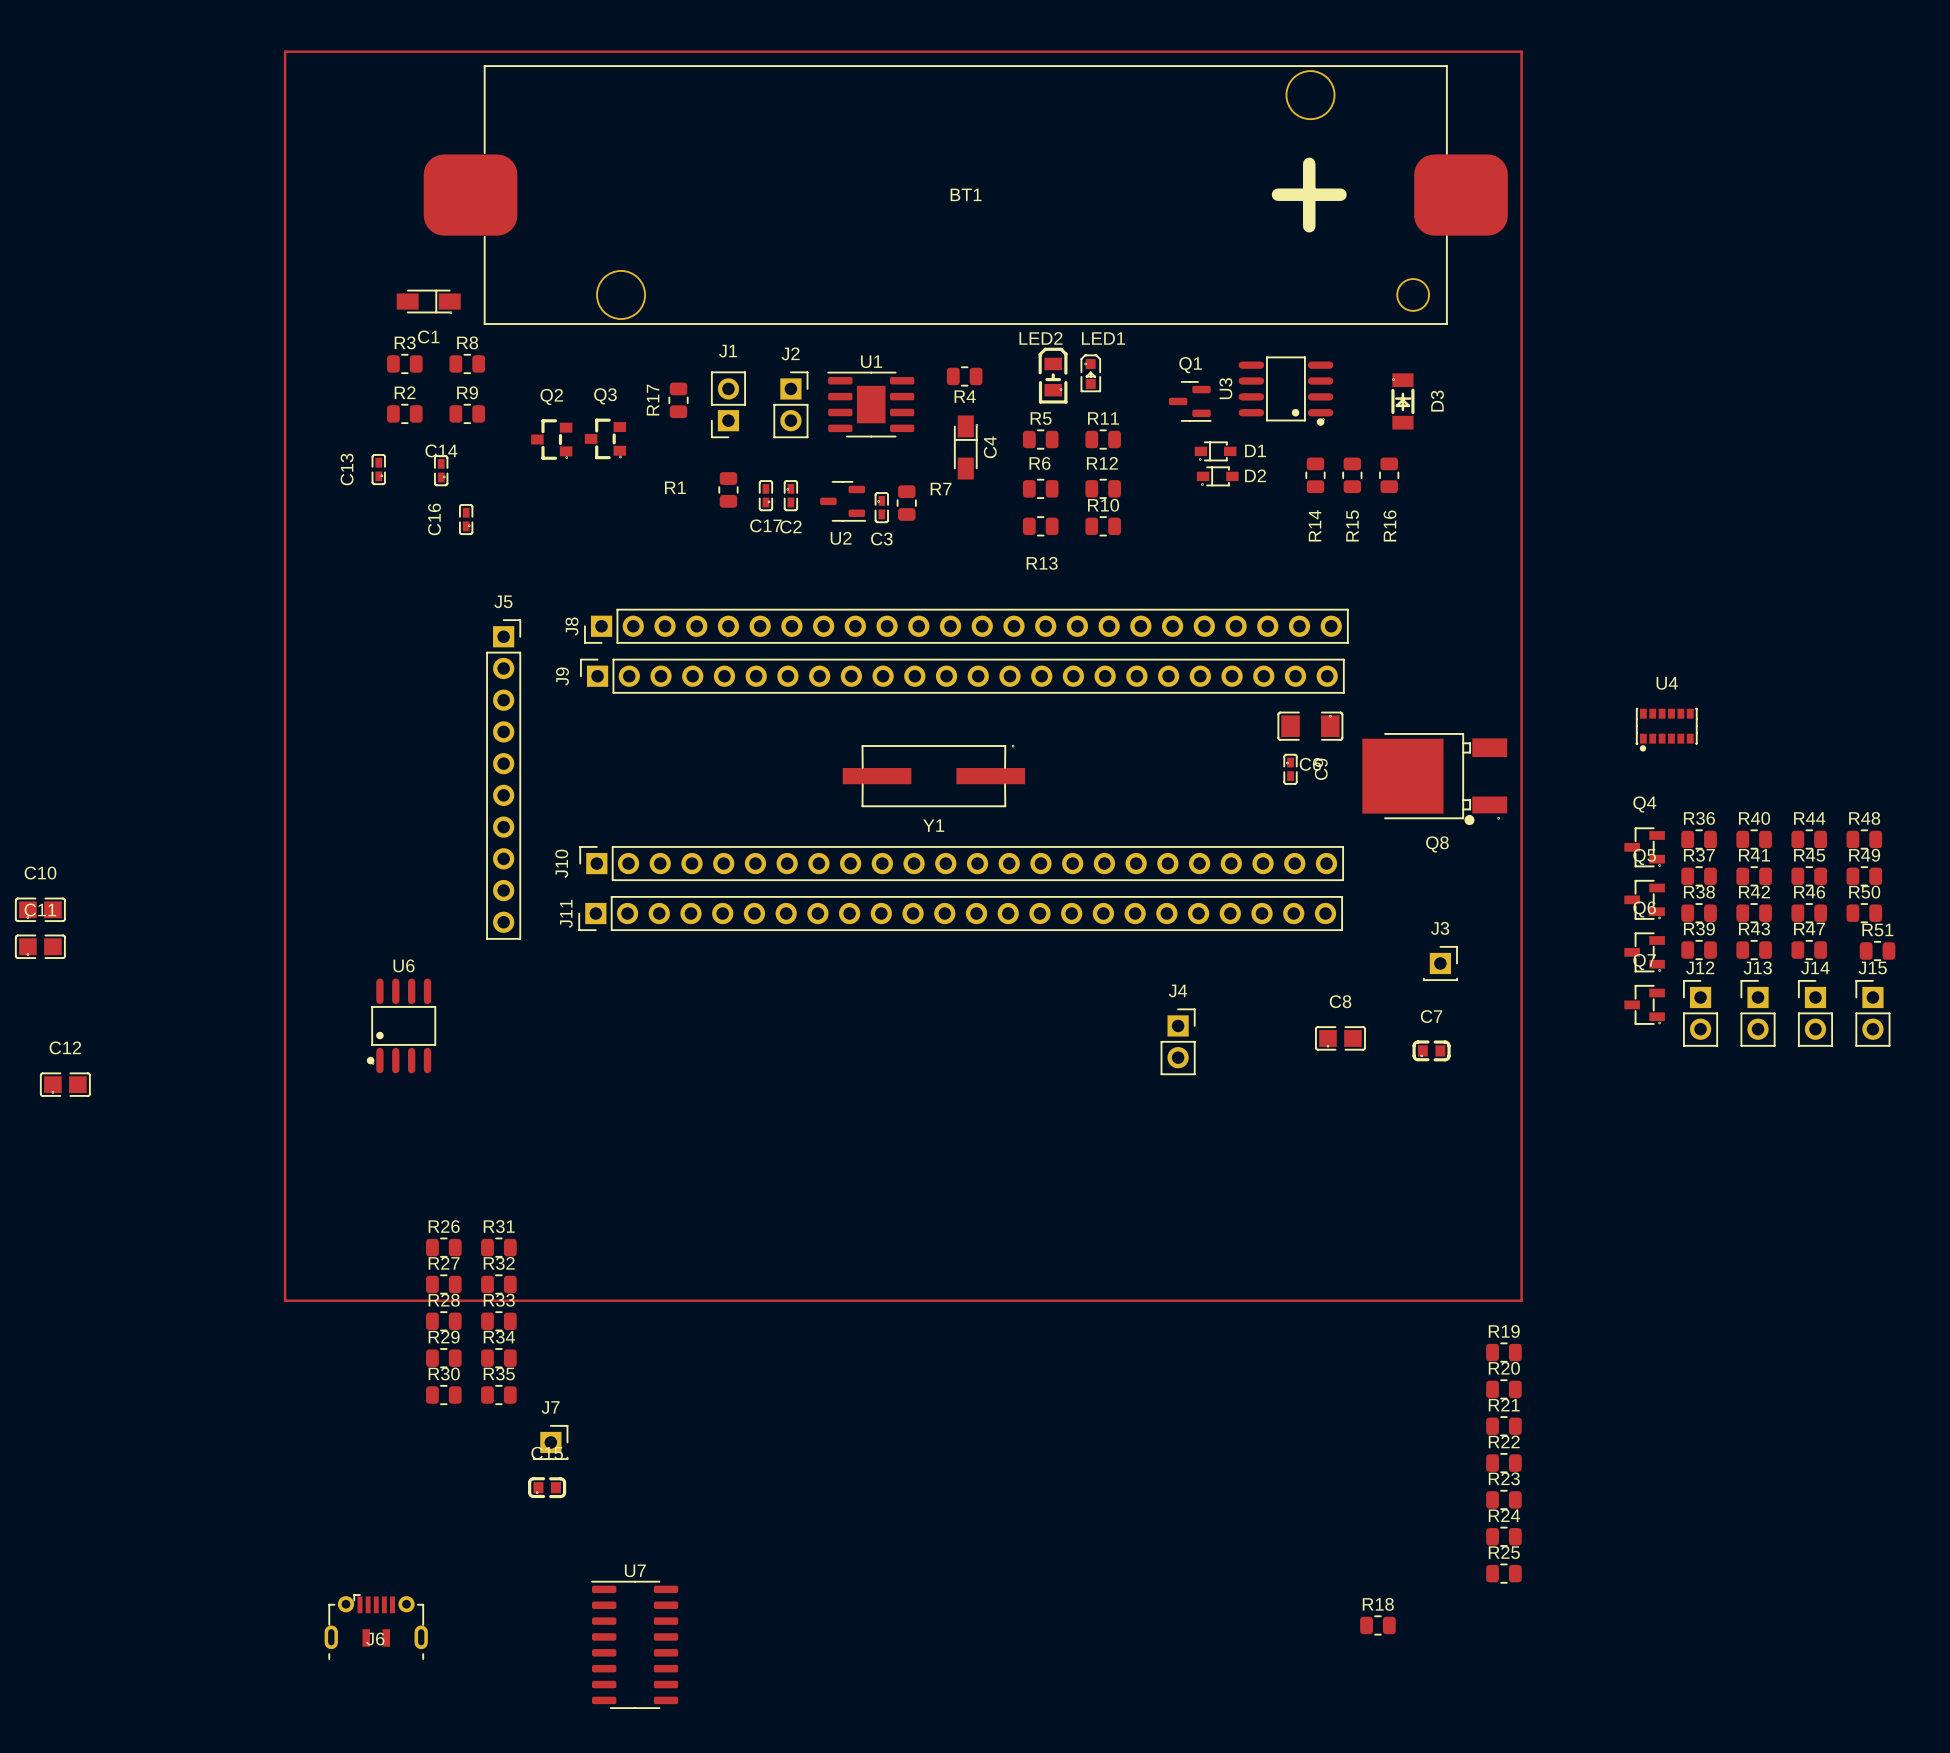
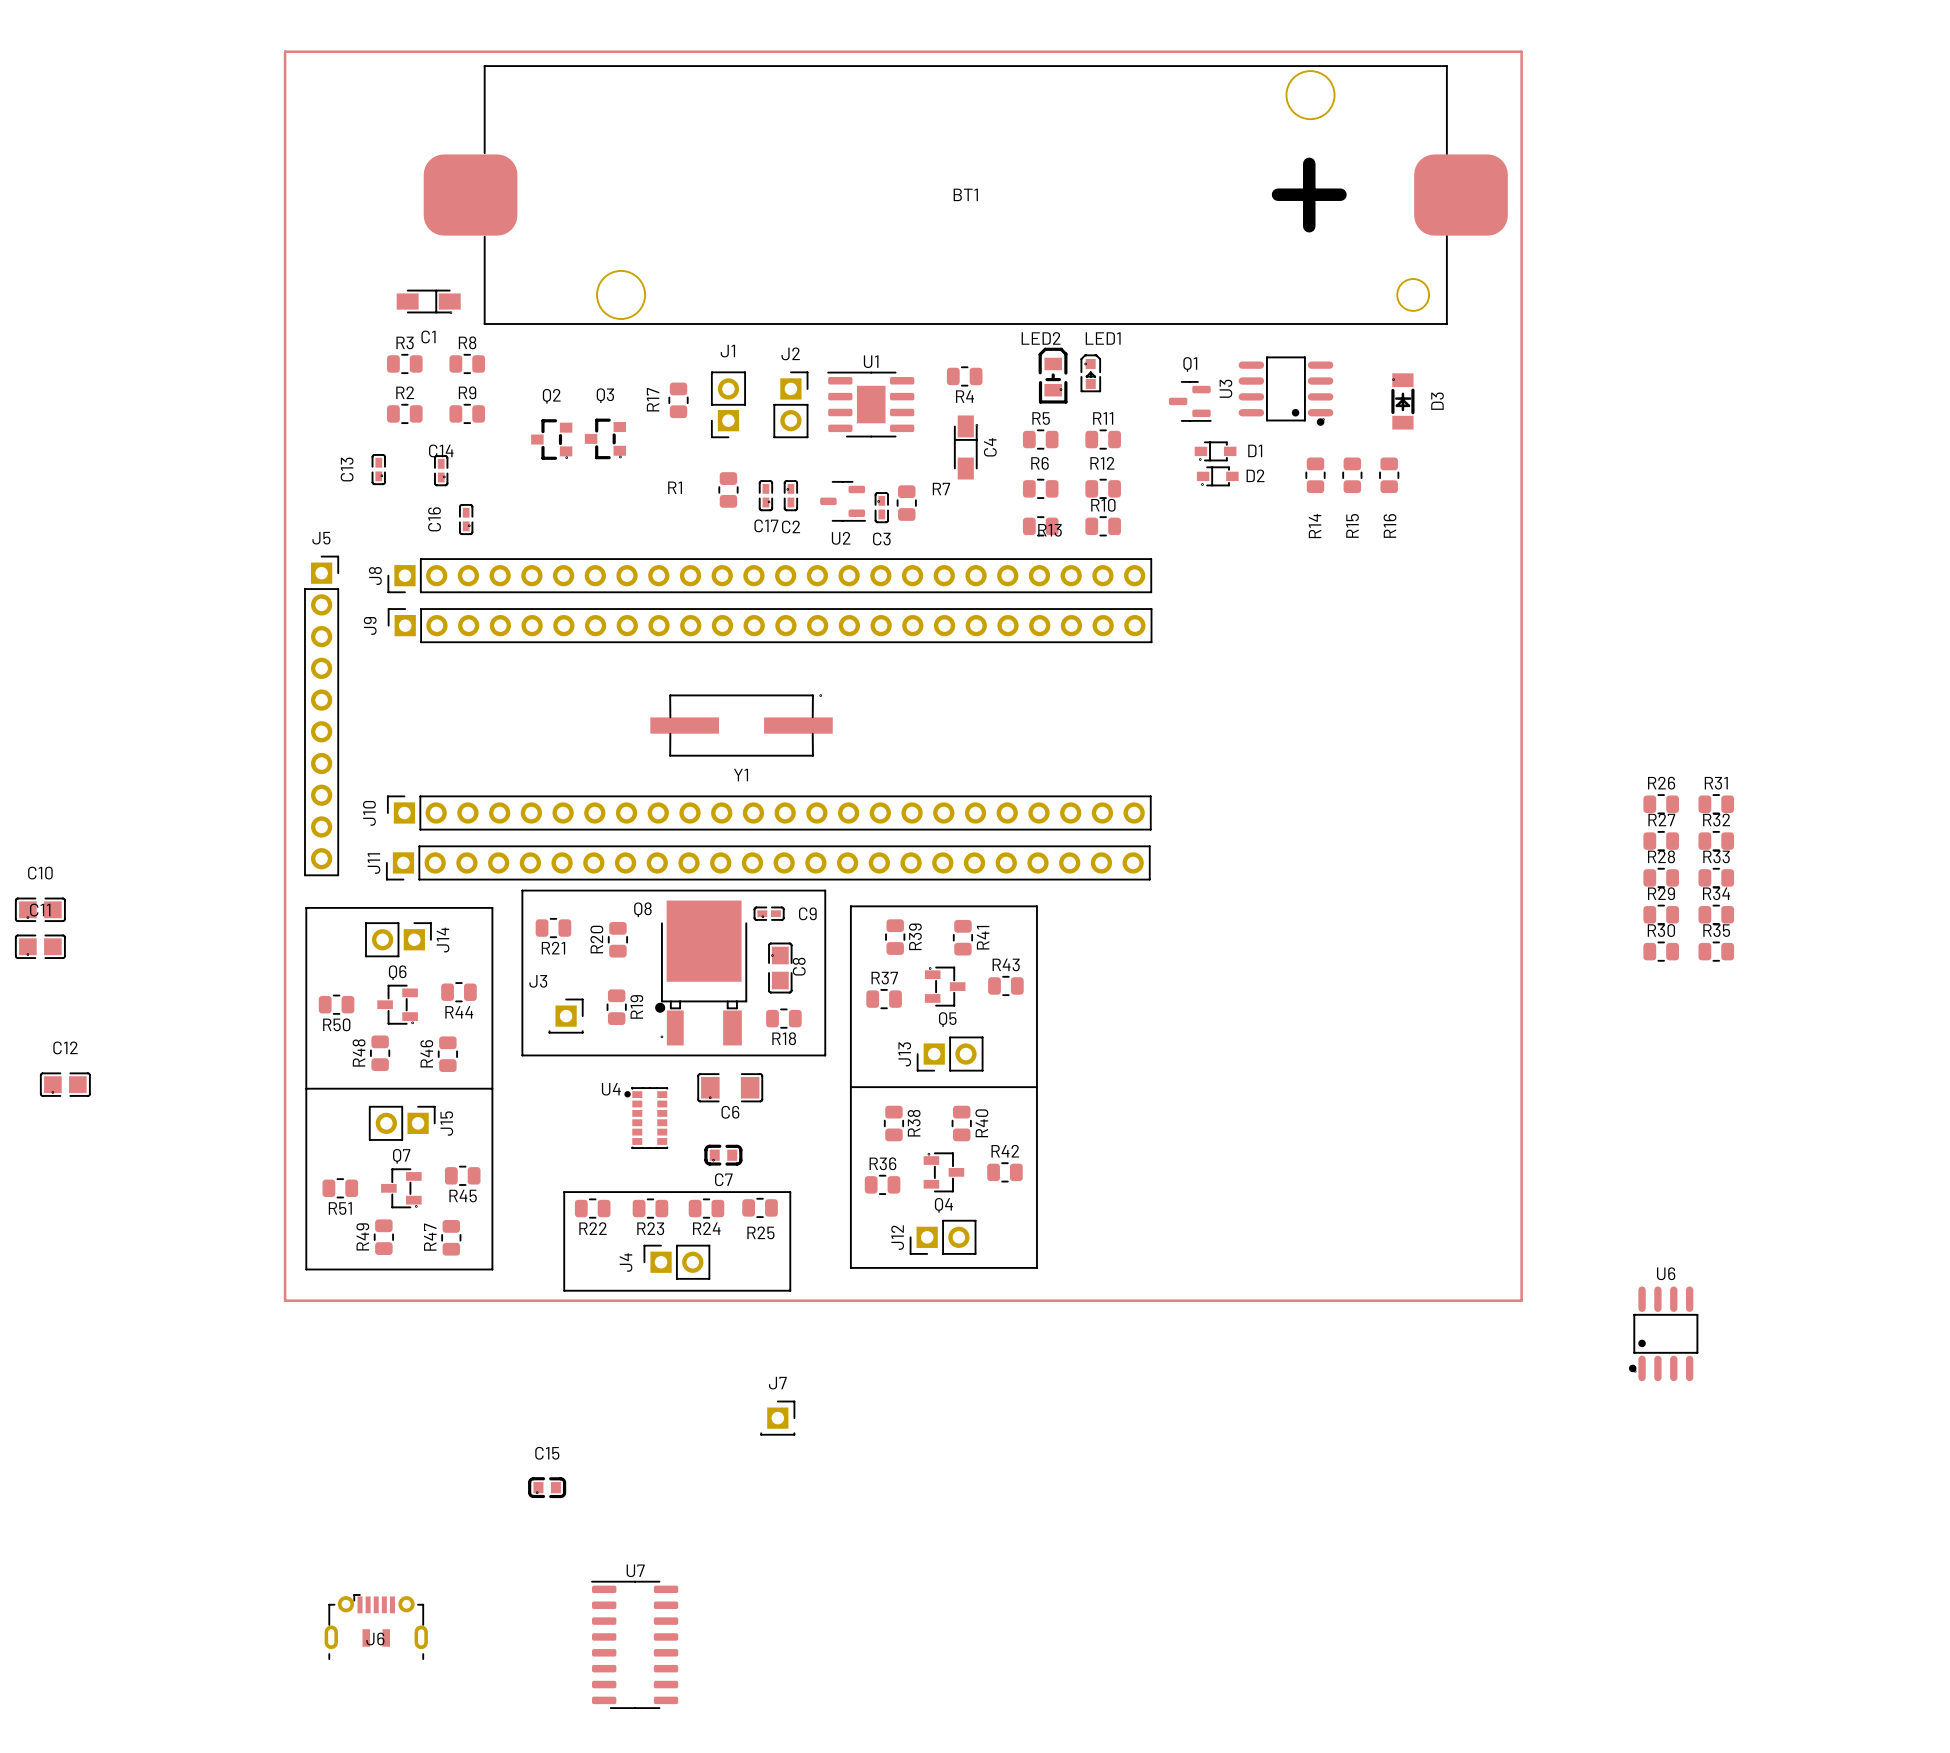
R13 name position: R13 (1042, 563) -> R13 (1050, 530)
J8 position: (966, 626) -> (769, 575)
J9 position: (962, 676) -> (770, 625)
U4 name position: U4 (1667, 683) -> U4 (611, 1089)
C6 rotation: 0° (1310, 726) -> 180° (730, 1087)
C6 position: (1310, 726) -> (730, 1087)
U4 rotation: 0° (1666, 729) -> 90° clockwise (646, 1118)
U4 position: (1666, 729) -> (646, 1118)
C9 rotation: 0° (1290, 769) -> 90° counterclockwise (769, 913)
C9 position: (1290, 769) -> (769, 913)
Y1 position: (933, 776) -> (741, 725)
J5 position: (503, 779) -> (321, 715)
Q8 rotation: 0° (1434, 779) -> 90° clockwise (701, 973)
Q8 position: (1434, 779) -> (701, 973)
R44 name position: R44 (1809, 818) -> R44 (459, 1012)
R48 name position: R48 (1864, 818) -> R48 (359, 1052)
R36 position: (1699, 839) -> (882, 1184)
R40 rotation: 0° (1754, 839) -> 90° clockwise (961, 1123)
R40 position: (1754, 839) -> (961, 1123)
R44 position: (1809, 839) -> (458, 992)
R48 rotation: 0° (1864, 839) -> 90° clockwise (380, 1053)
R48 position: (1864, 839) -> (380, 1053)
Q8 name position: Q8 (1437, 844) -> Q8 (642, 909)
Q4 rotation: 0° (1644, 847) -> 180° (943, 1172)
Q4 position: (1644, 847) -> (943, 1172)
R45 name position: R45 (1809, 855) -> R45 (463, 1196)
R49 name position: R49 (1864, 855) -> R49 (362, 1236)
J10 position: (961, 863) -> (769, 812)
R37 position: (1699, 876) -> (884, 999)
R41 rotation: 0° (1754, 876) -> 90° clockwise (962, 937)
R41 position: (1754, 876) -> (962, 937)
R45 position: (1809, 876) -> (462, 1175)
R49 rotation: 0° (1864, 876) -> 90° clockwise (383, 1237)
R49 position: (1864, 876) -> (383, 1237)
line: none -> (522, 890) (825, 890) (825, 1055) (522, 1055) (522, 890)
R46 name position: R46 (1809, 892) -> R46 (426, 1053)
R50 name position: R50 (1864, 892) -> R50 (336, 1024)
Q5 rotation: 0° (1644, 899) -> 180° (945, 986)
Q5 position: (1644, 899) -> (945, 986)
line: none -> (850, 906) (1036, 906) (1036, 1267) (850, 1267) (850, 906)
line: none -> (306, 907) (492, 907) (492, 1269) (306, 1269) (306, 907)
Q6 name position: Q6 (1644, 909) -> Q6 (397, 972)
J11 position: (960, 913) -> (768, 862)
R38 rotation: 0° (1699, 913) -> 90° clockwise (893, 1123)
R38 position: (1699, 913) -> (893, 1123)
R42 position: (1754, 913) -> (1004, 1172)
R46 rotation: 0° (1809, 913) -> 90° clockwise (447, 1054)
R46 position: (1809, 913) -> (447, 1054)
R50 position: (1864, 913) -> (336, 1004)
J3 name position: J3 (1440, 928) -> J3 (538, 981)
R47 name position: R47 (1809, 928) -> R47 (430, 1237)
R51 name position: R51 (1877, 930) -> R51 (340, 1208)
R39 rotation: 0° (1699, 950) -> 90° clockwise (895, 937)
R39 position: (1699, 950) -> (895, 937)
R43 position: (1754, 950) -> (1005, 985)
R47 rotation: 0° (1809, 950) -> 90° clockwise (451, 1237)
R47 position: (1809, 950) -> (451, 1237)
R51 position: (1877, 951) -> (340, 1188)
Q6 position: (1644, 952) -> (397, 1004)
Q7 name position: Q7 (1644, 962) -> Q7 (401, 1156)
J3 position: (1440, 963) -> (566, 1016)
Q7 position: (1644, 1004) -> (401, 1188)
J12 rotation: 0° (1700, 1013) -> 90° counterclockwise (943, 1237)
J12 position: (1700, 1013) -> (943, 1237)
J13 rotation: 0° (1758, 1013) -> 90° counterclockwise (950, 1054)
J13 position: (1758, 1013) -> (950, 1054)
J14 rotation: 0° (1815, 1013) -> 90° clockwise (398, 939)
J14 position: (1815, 1013) -> (398, 939)
J15 rotation: 0° (1872, 1013) -> 90° clockwise (402, 1123)
J15 position: (1872, 1013) -> (402, 1123)
C7 name position: C7 (1431, 1016) -> C7 (723, 1179)
U6 position: (401, 1025) -> (1663, 1333)
C8 rotation: 0° (1340, 1038) -> 90° clockwise (780, 968)
C8 position: (1340, 1038) -> (780, 968)
J4 rotation: 0° (1178, 1041) -> 90° counterclockwise (676, 1262)
J4 position: (1178, 1041) -> (676, 1262)
C7 position: (1431, 1050) -> (723, 1155)
line: none -> (850, 1087) (1036, 1087)
line: none -> (306, 1088) (492, 1088)
line: none -> (564, 1192) (790, 1192) (790, 1290) (564, 1290) (564, 1192)
R26 position: (443, 1247) -> (1661, 804)
R31 position: (498, 1247) -> (1716, 804)
R27 position: (443, 1284) -> (1661, 841)
R32 position: (498, 1284) -> (1716, 841)
R28 position: (443, 1321) -> (1661, 877)
R33 position: (498, 1321) -> (1716, 877)
R19 rotation: 0° (1503, 1352) -> 90° clockwise (616, 1007)
R19 position: (1503, 1352) -> (616, 1007)
R29 position: (443, 1358) -> (1661, 914)
R34 position: (498, 1358) -> (1716, 914)
R20 name position: R20 (1504, 1368) -> R20 (596, 939)
R20 rotation: 0° (1503, 1389) -> 90° clockwise (617, 939)
R20 position: (1503, 1389) -> (617, 939)
R30 position: (443, 1395) -> (1661, 951)
R35 position: (498, 1395) -> (1716, 951)
R21 name position: R21 (1504, 1405) -> R21 (553, 948)
R21 position: (1503, 1426) -> (553, 928)
R22 name position: R22 (1504, 1441) -> R22 (593, 1228)
J7 position: (550, 1442) -> (777, 1418)
R22 position: (1503, 1463) -> (592, 1208)
R23 name position: R23 (1504, 1478) -> R23 (650, 1228)
R23 position: (1503, 1499) -> (650, 1208)
R24 name position: R24 (1504, 1515) -> R24 (706, 1228)
R24 position: (1503, 1536) -> (706, 1208)
R25 name position: R25 (1504, 1552) -> R25 (760, 1232)
R25 position: (1503, 1573) -> (760, 1207)
R18 name position: R18 (1378, 1604) -> R18 (784, 1038)
R18 position: (1377, 1625) -> (783, 1018)

